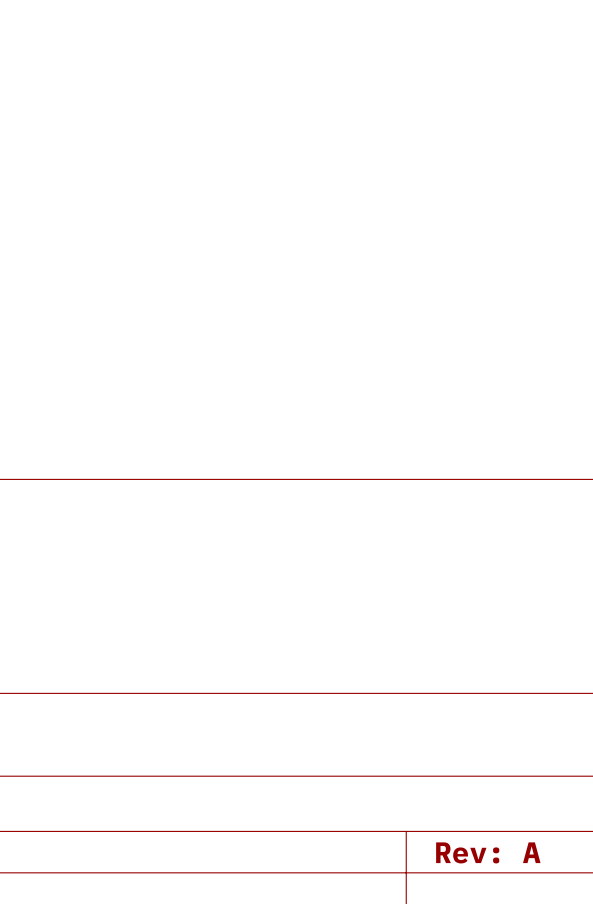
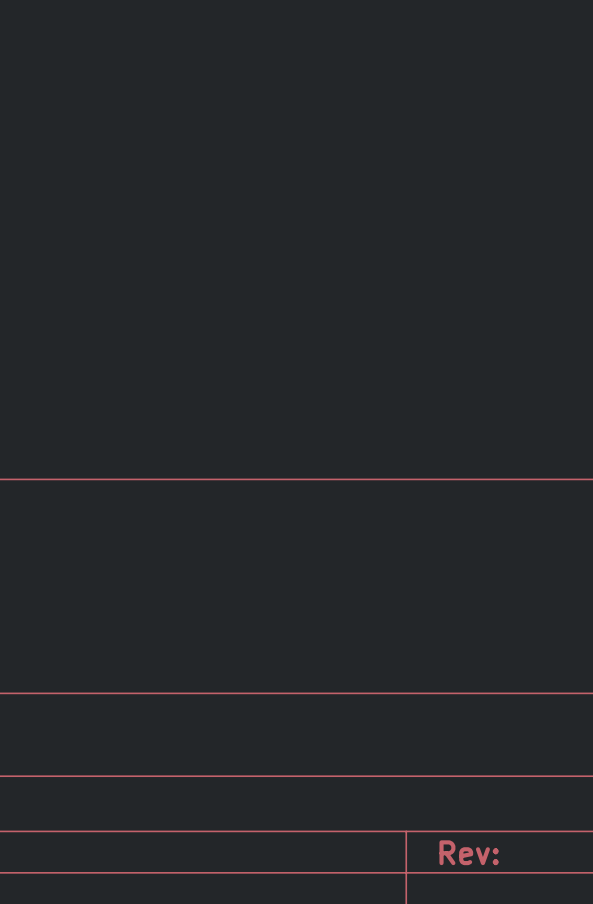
title block: Rev: A (488, 852) -> Rev: (469, 852)

